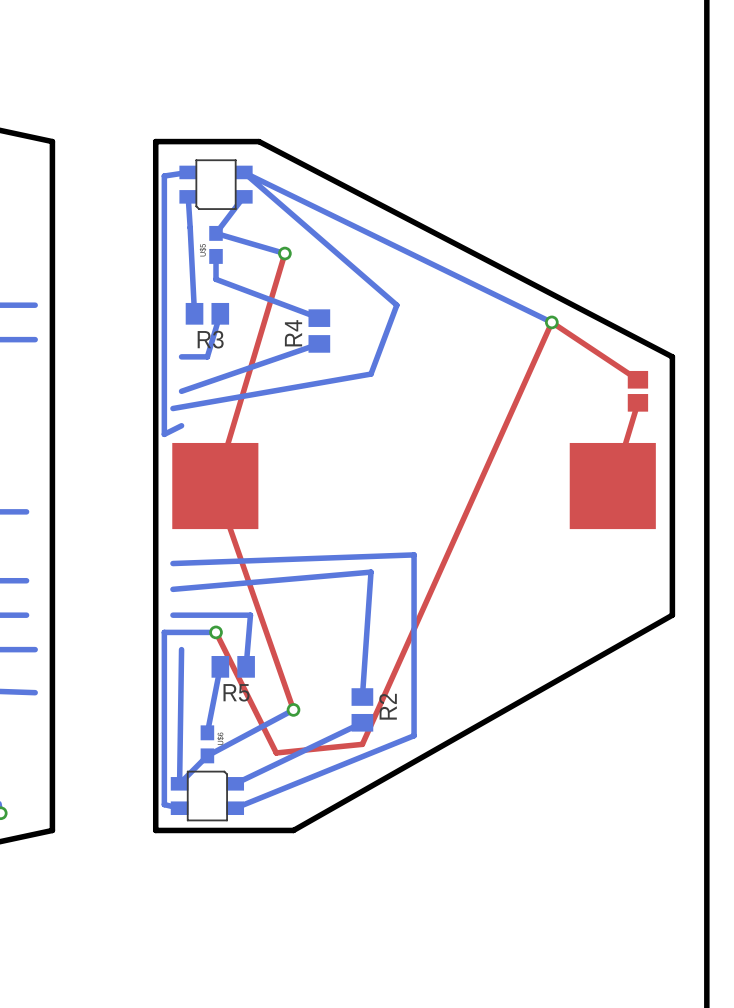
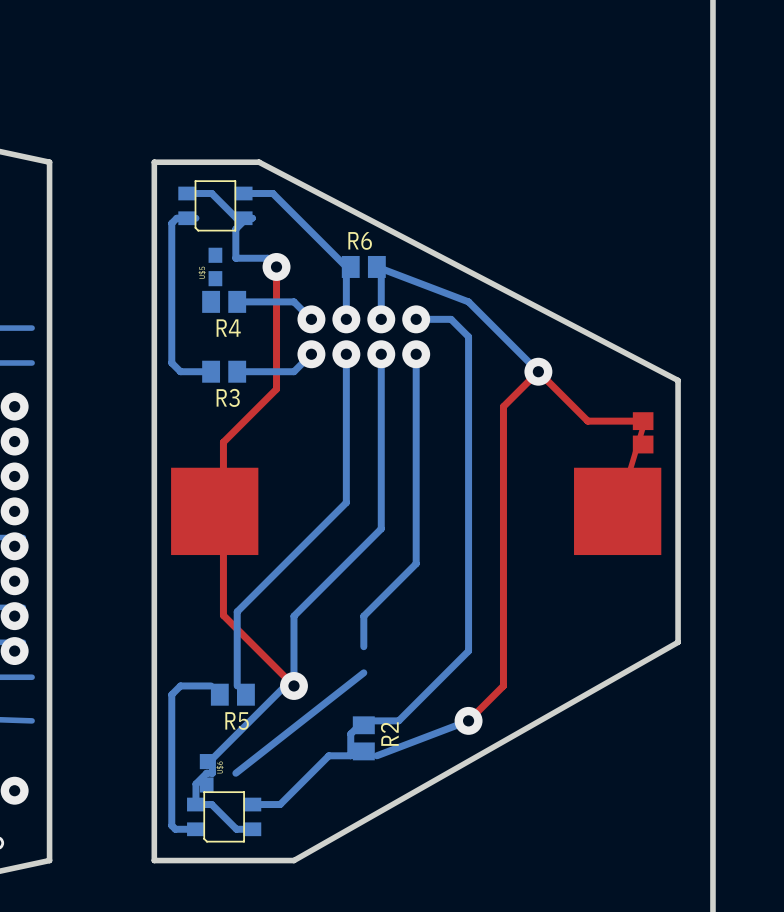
bottom track: (188, 172) (164, 176) (164, 434) (181, 425) -> none
bottom track: none -> (195, 193) (211, 193) (236, 218) (252, 218)
bottom track: none -> (252, 193) (272, 193) (346, 266) (350, 266) (346, 271) (346, 319)
bottom track: (188, 196) (194, 313) -> none
bottom track: none -> (195, 218) (176, 218) (171, 223) (171, 362) (180, 371) (211, 371)
bottom track: (243, 196) (216, 233) (284, 253) -> none
bottom track: none -> (246, 218) (235, 229) (235, 258) (267, 258) (276, 266)
top track: none -> (276, 266) (276, 389) (223, 442) (223, 615) (293, 685)
R6: none -> (363, 266)
bottom track: none -> (376, 266) (468, 301) (538, 371)
bottom track: none -> (376, 266) (381, 271) (381, 319)
via size: [278, 246, 292, 261] -> [262, 253, 291, 281]
top track: (284, 253) (215, 486) (293, 709) -> none
bottom track: (216, 256) (216, 279) (319, 318) -> none
bottom track: none -> (237, 301) (293, 301) (311, 319)
via: none -> (311, 319)
via: none -> (346, 319)
via: none -> (381, 319)
bottom track: none -> (416, 319) (451, 319) (468, 336) (468, 651) (398, 720) (363, 720) (350, 733) (350, 755) (328, 755) (280, 804) (252, 804)
via: none -> (416, 319)
R3 position: (207, 313) -> (224, 371)
bottom track: (220, 313) (207, 356) (181, 356) -> none
bottom track: (551, 322) (243, 172) (396, 305) (371, 374) (172, 408) -> none
via: (551, 322) -> none
bottom track: none -> (311, 354) (293, 371) (237, 371)
via: none -> (311, 354)
R4 rotation: 0° (319, 331) -> 90° clockwise (224, 301)
R4 position: (319, 331) -> (224, 301)
bottom track: none -> (346, 354) (346, 502) (237, 611) (237, 685)
via: none -> (346, 354)
bottom track: none -> (381, 354) (381, 528) (293, 616) (293, 685) (285, 685) (212, 758) (212, 773) (206, 773) (195, 783) (195, 804) (211, 804) (236, 829) (252, 829)
via: none -> (381, 354)
bottom track: none -> (416, 354) (416, 563) (363, 616) (363, 646)
via: none -> (416, 354)
R4 name position: R4 (293, 333) -> R4 (228, 328)
bottom track: (319, 343) (181, 391) -> none
via: none -> (538, 371)
top track: (637, 379) (551, 322) (362, 744) (276, 752) (216, 632) -> none
via: none -> (14, 406)
part position: (637, 391) -> (643, 432)
top track: none -> (643, 421) (587, 421) (538, 371) (503, 406) (503, 685) (468, 720)
via: none -> (14, 441)
via: none -> (14, 476)
via: none -> (14, 511)
via: none -> (14, 546)
via: none -> (14, 581)
bottom track: (172, 563) (414, 554) (414, 735) (235, 808) -> none
via: none -> (14, 616)
bottom track: (172, 589) (371, 572) (362, 697) -> none
bottom track: (172, 615) (250, 615) (246, 666) -> none
via: none -> (14, 651)
bottom track: (216, 632) (164, 632) (164, 804) (179, 808) -> none
via: (216, 632) -> none
bottom track: none -> (363, 672) (235, 773)
bottom track: (181, 649) (179, 783) (207, 755) (293, 709) -> none
bottom track: none -> (211, 685) (180, 685) (171, 694) (171, 825) (175, 829) (195, 829)
via: none -> (293, 685)
bottom track: (220, 666) (207, 732) -> none
bottom track: none -> (468, 720) (376, 755)
via: none -> (468, 720)
via: (293, 709) -> none
bottom track: (362, 722) (235, 783) -> none
via: none -> (14, 790)
part rotation: 0° (207, 796) -> 180° (224, 816)

